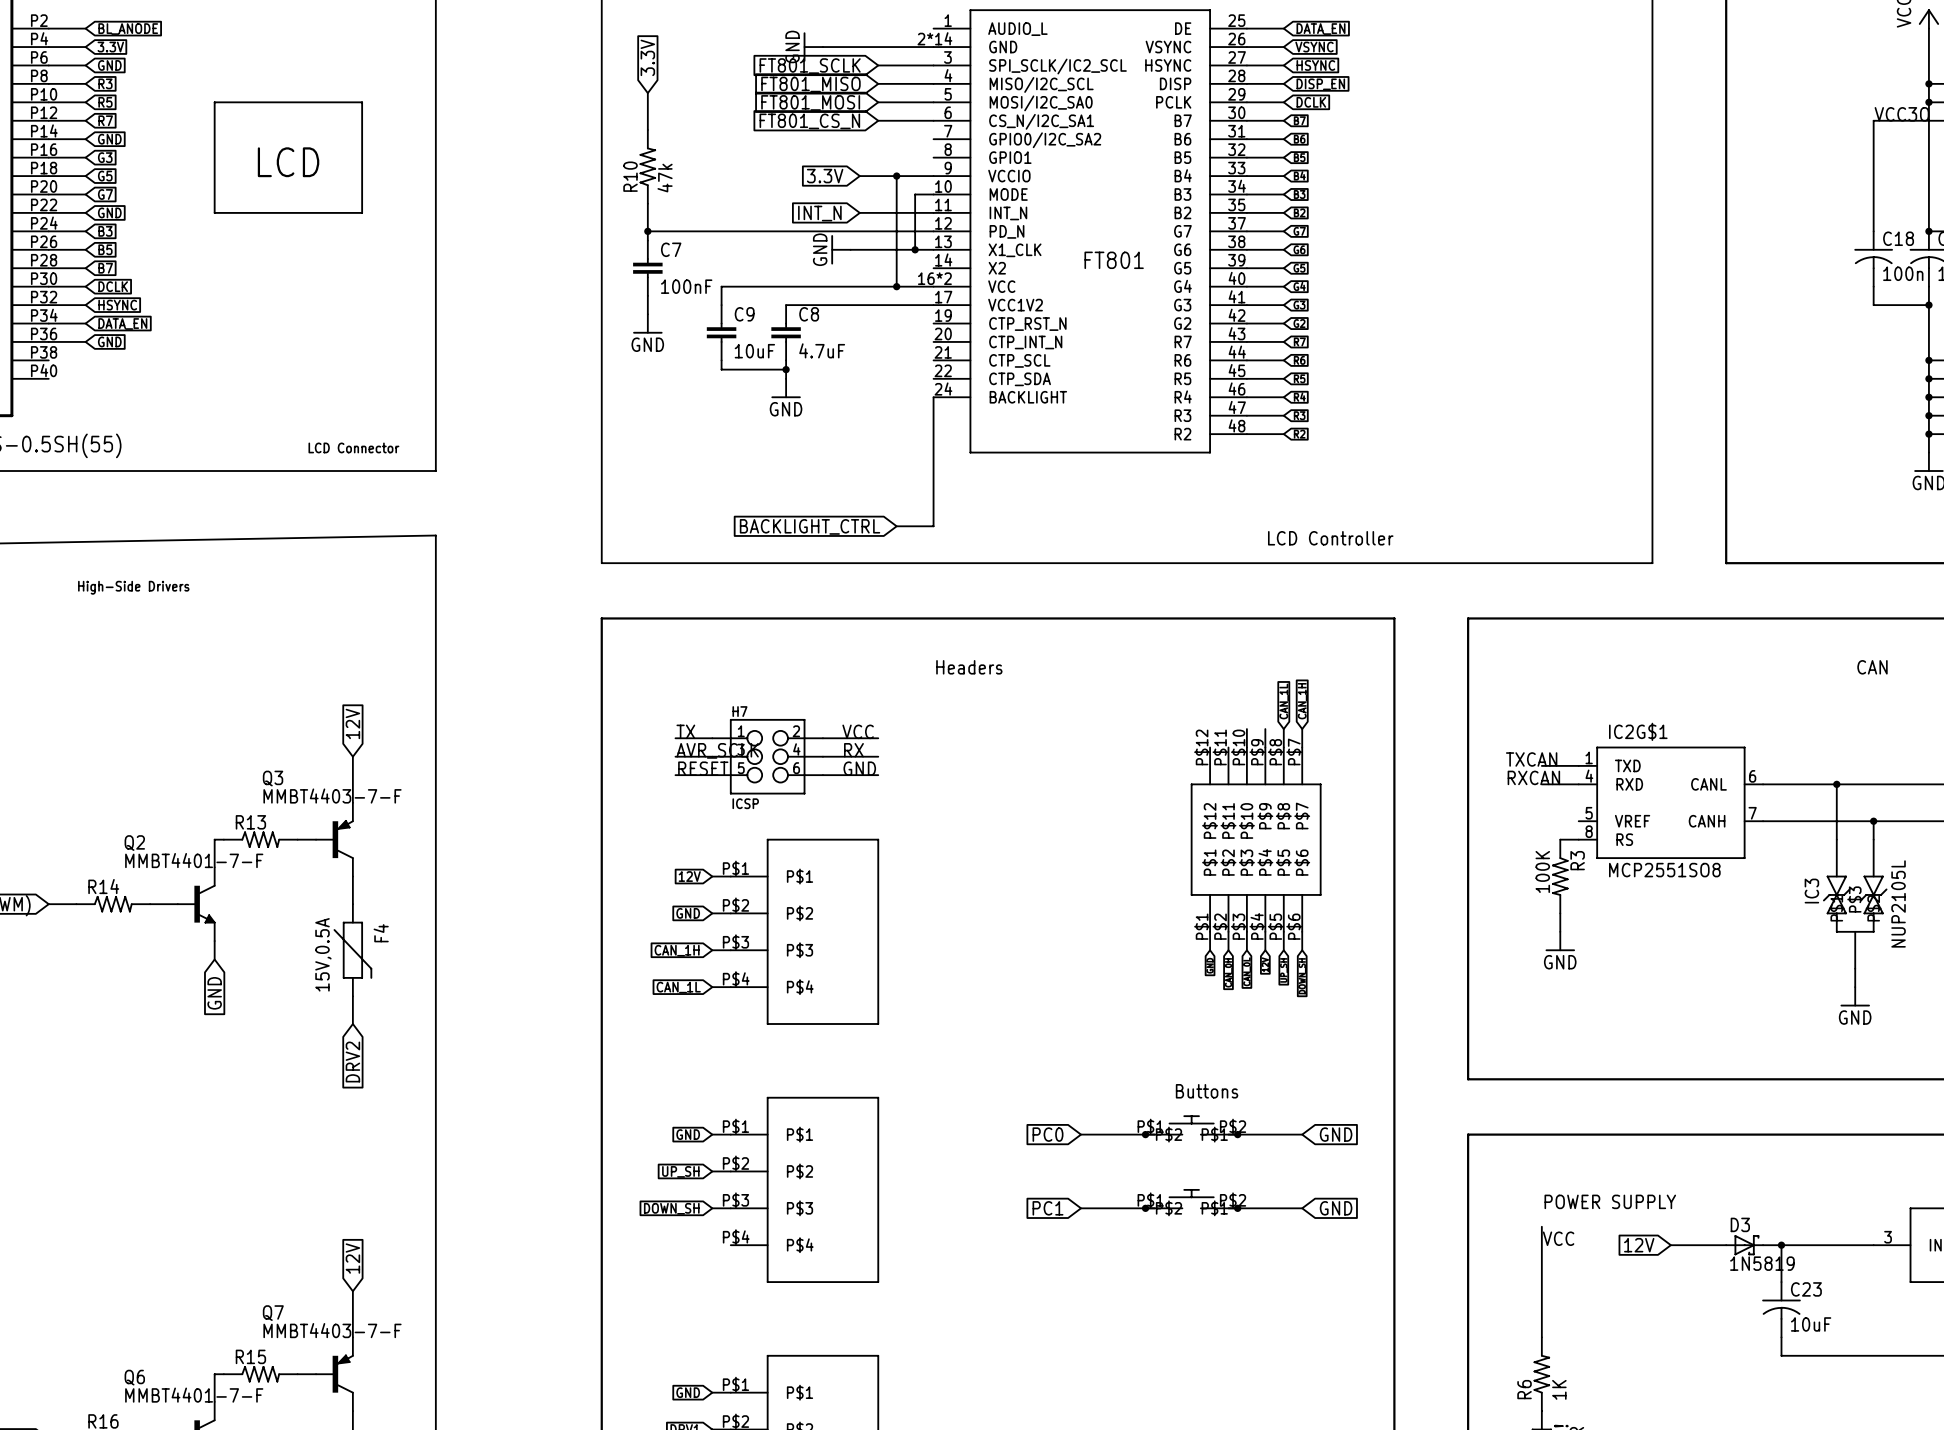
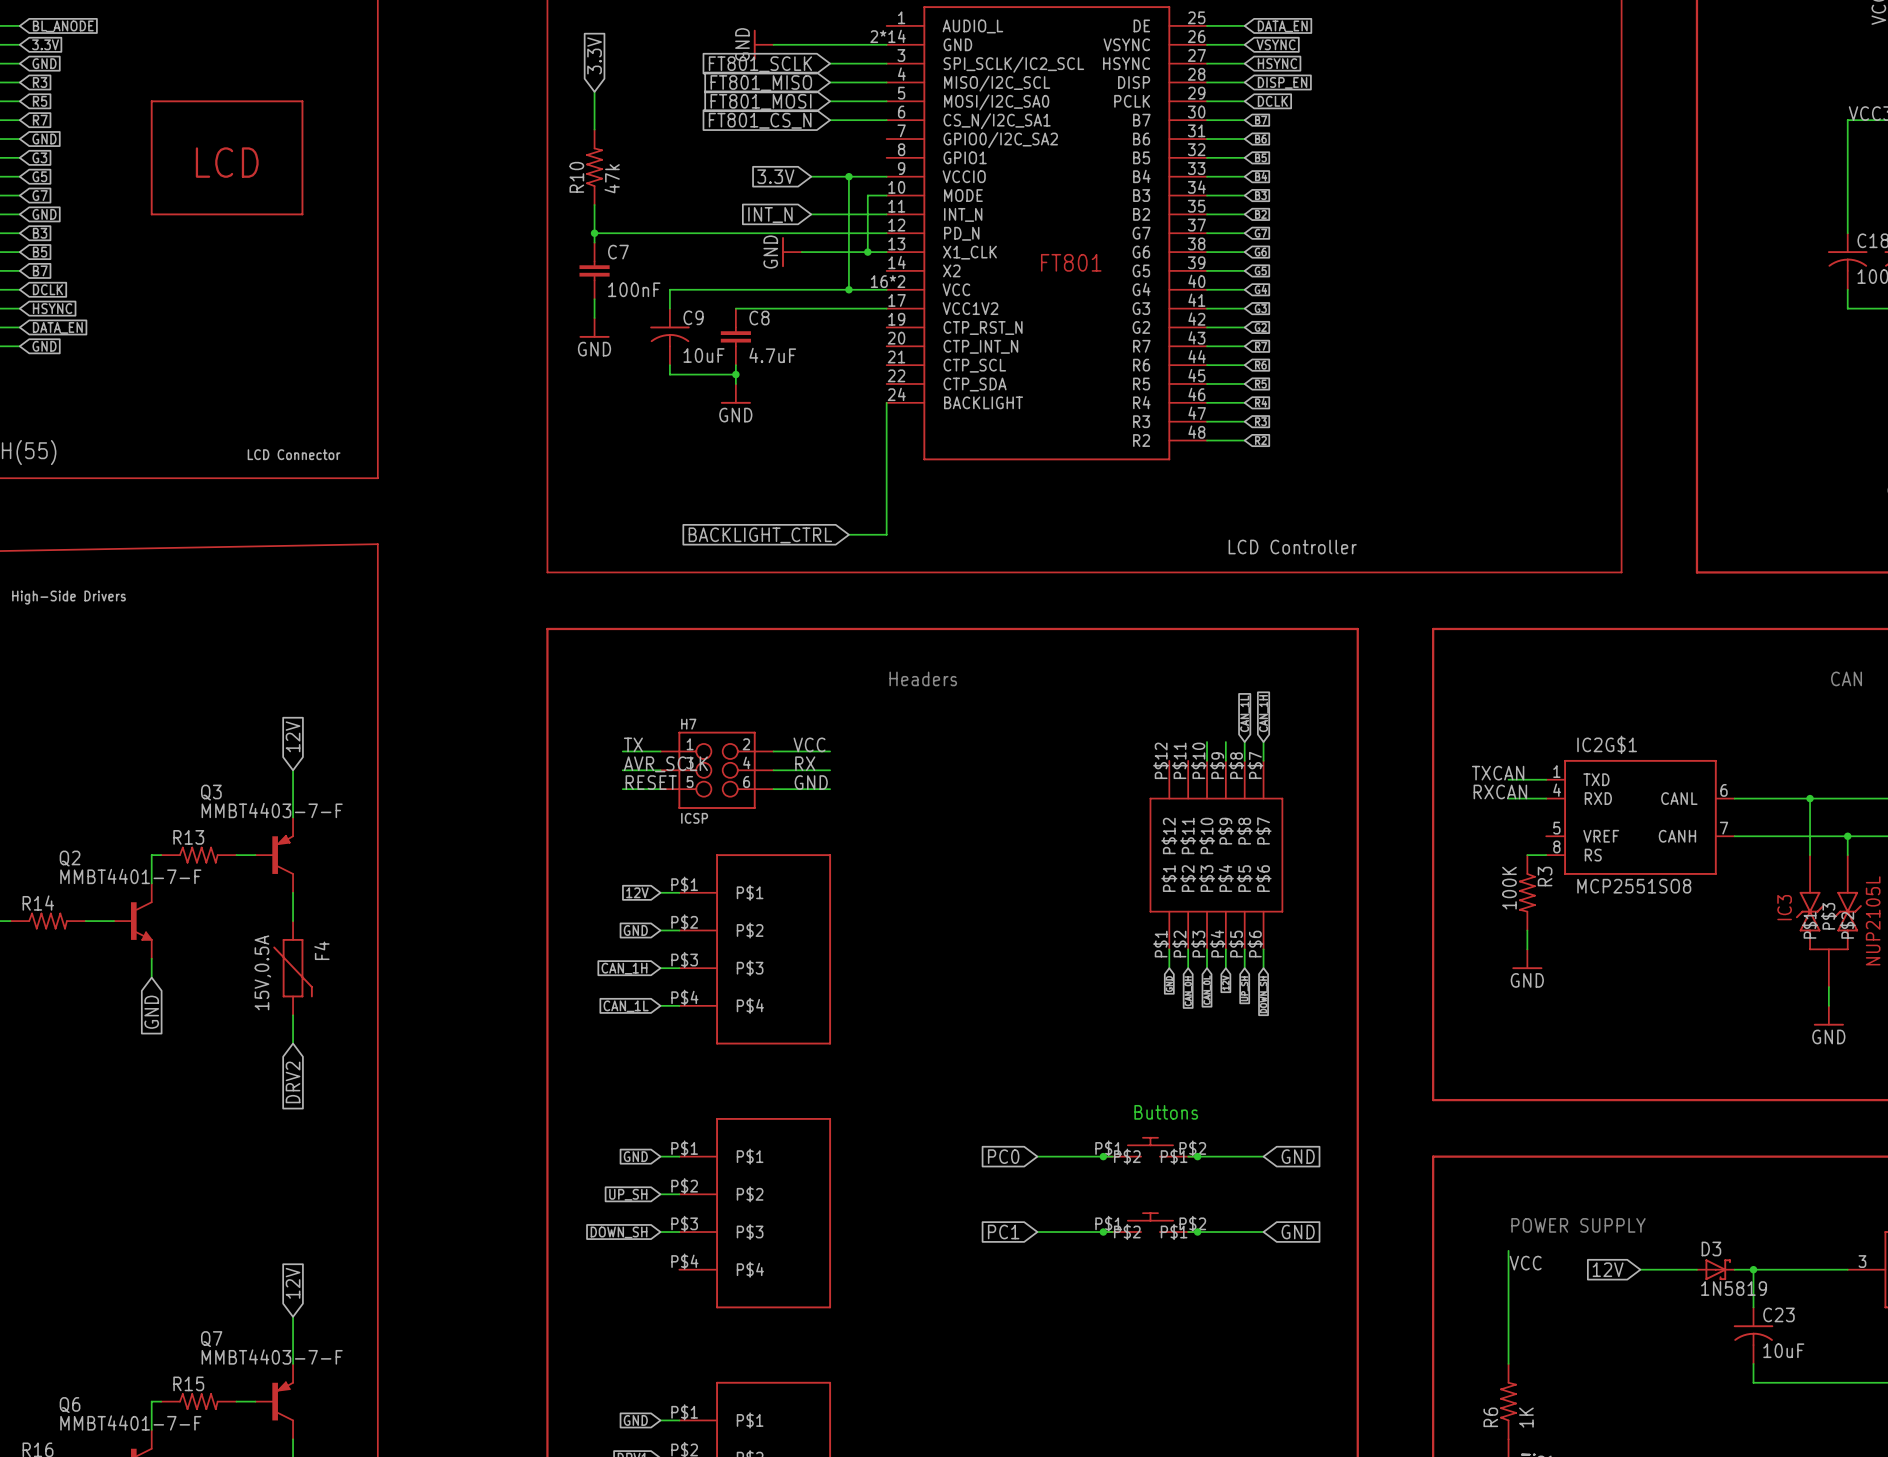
C9 symbol: [706, 305, 737, 361] -> [650, 308, 690, 366]

